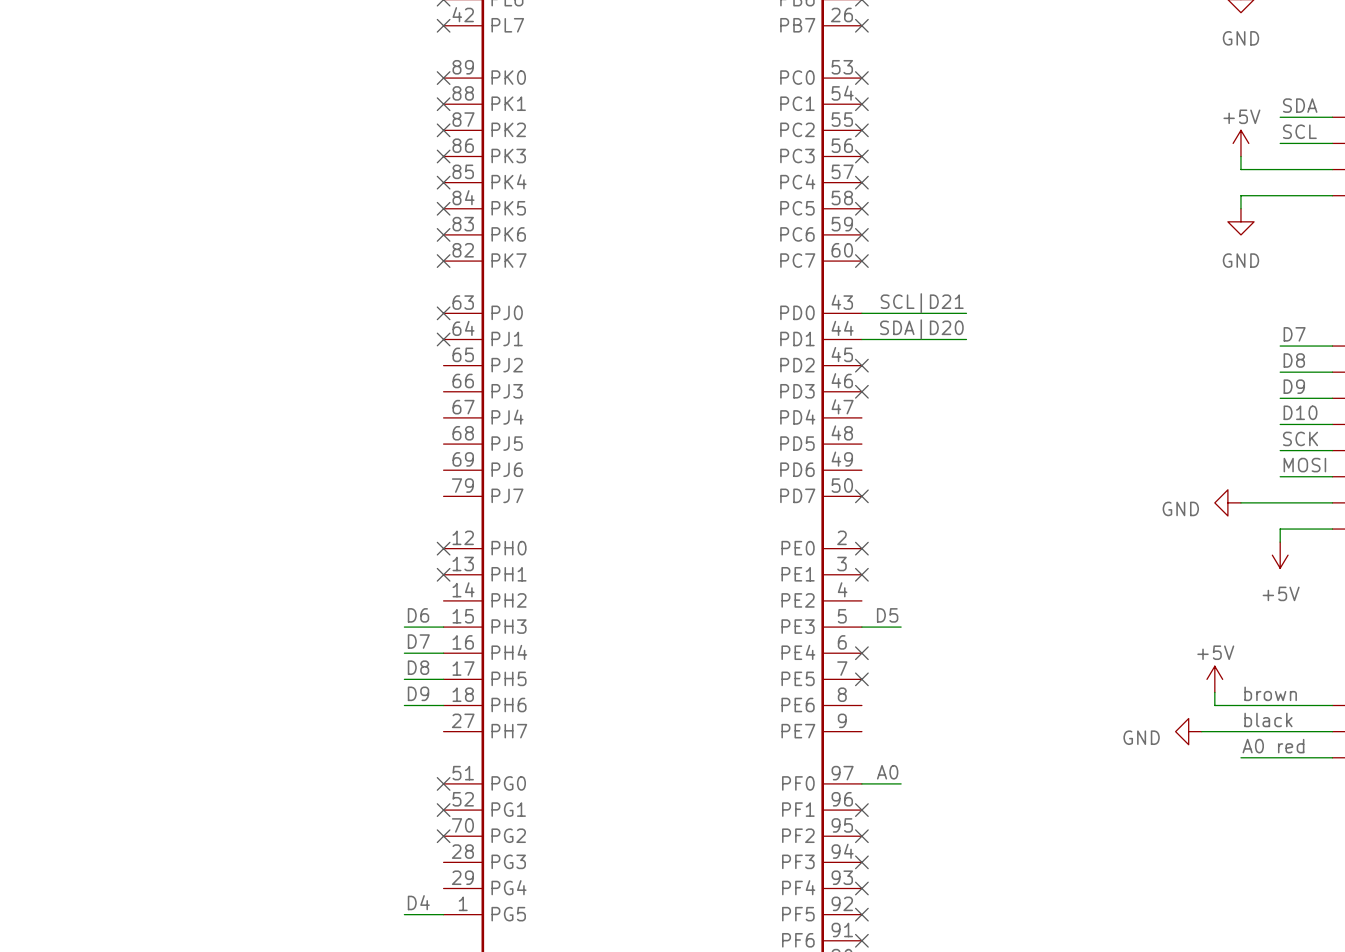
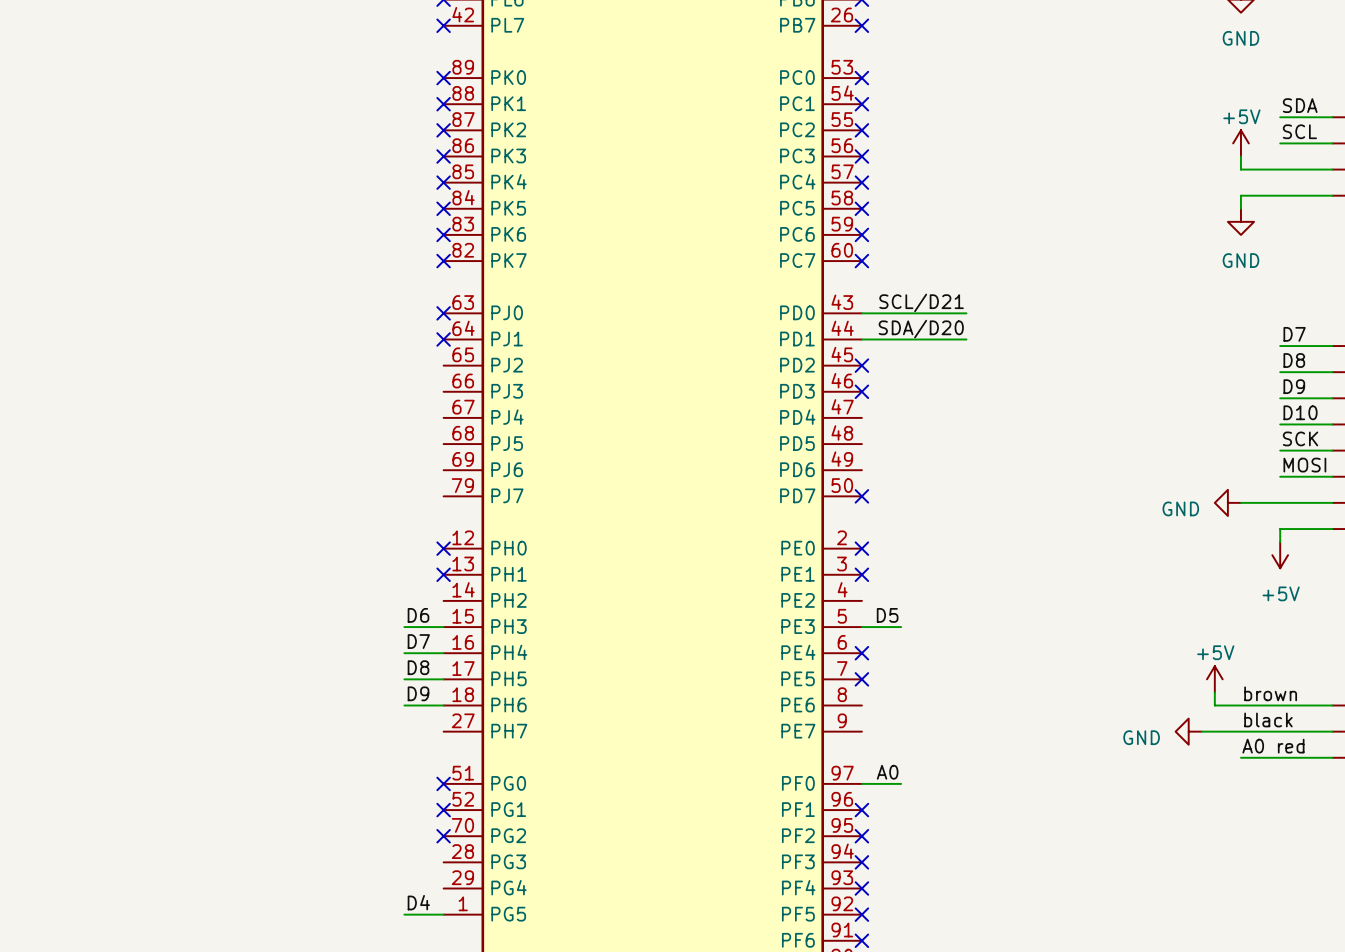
label: SCL|D21 (922, 303) -> SCL/D21 (921, 302)
label: SDA|D20 (921, 329) -> SDA/D20 (921, 329)

